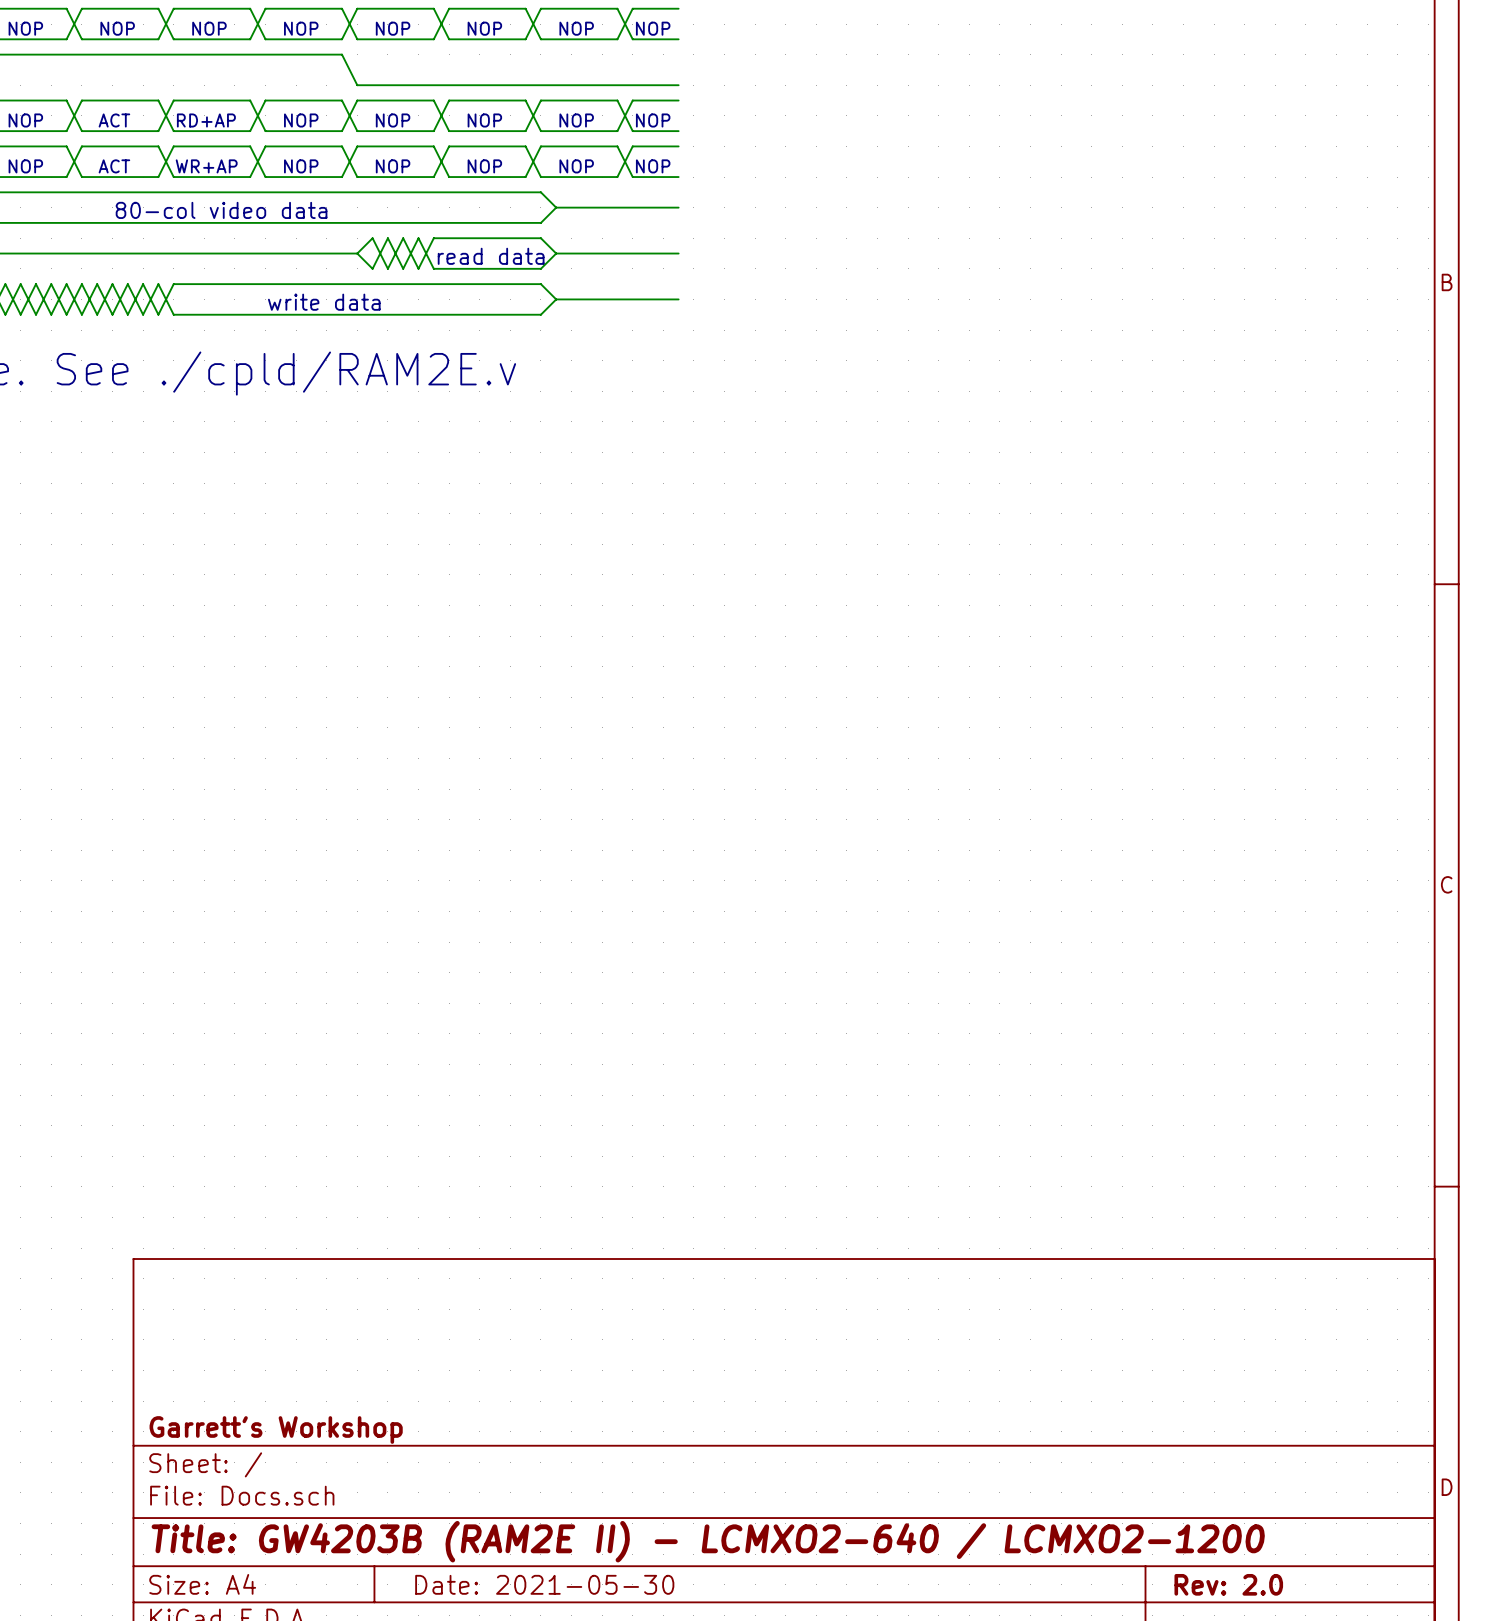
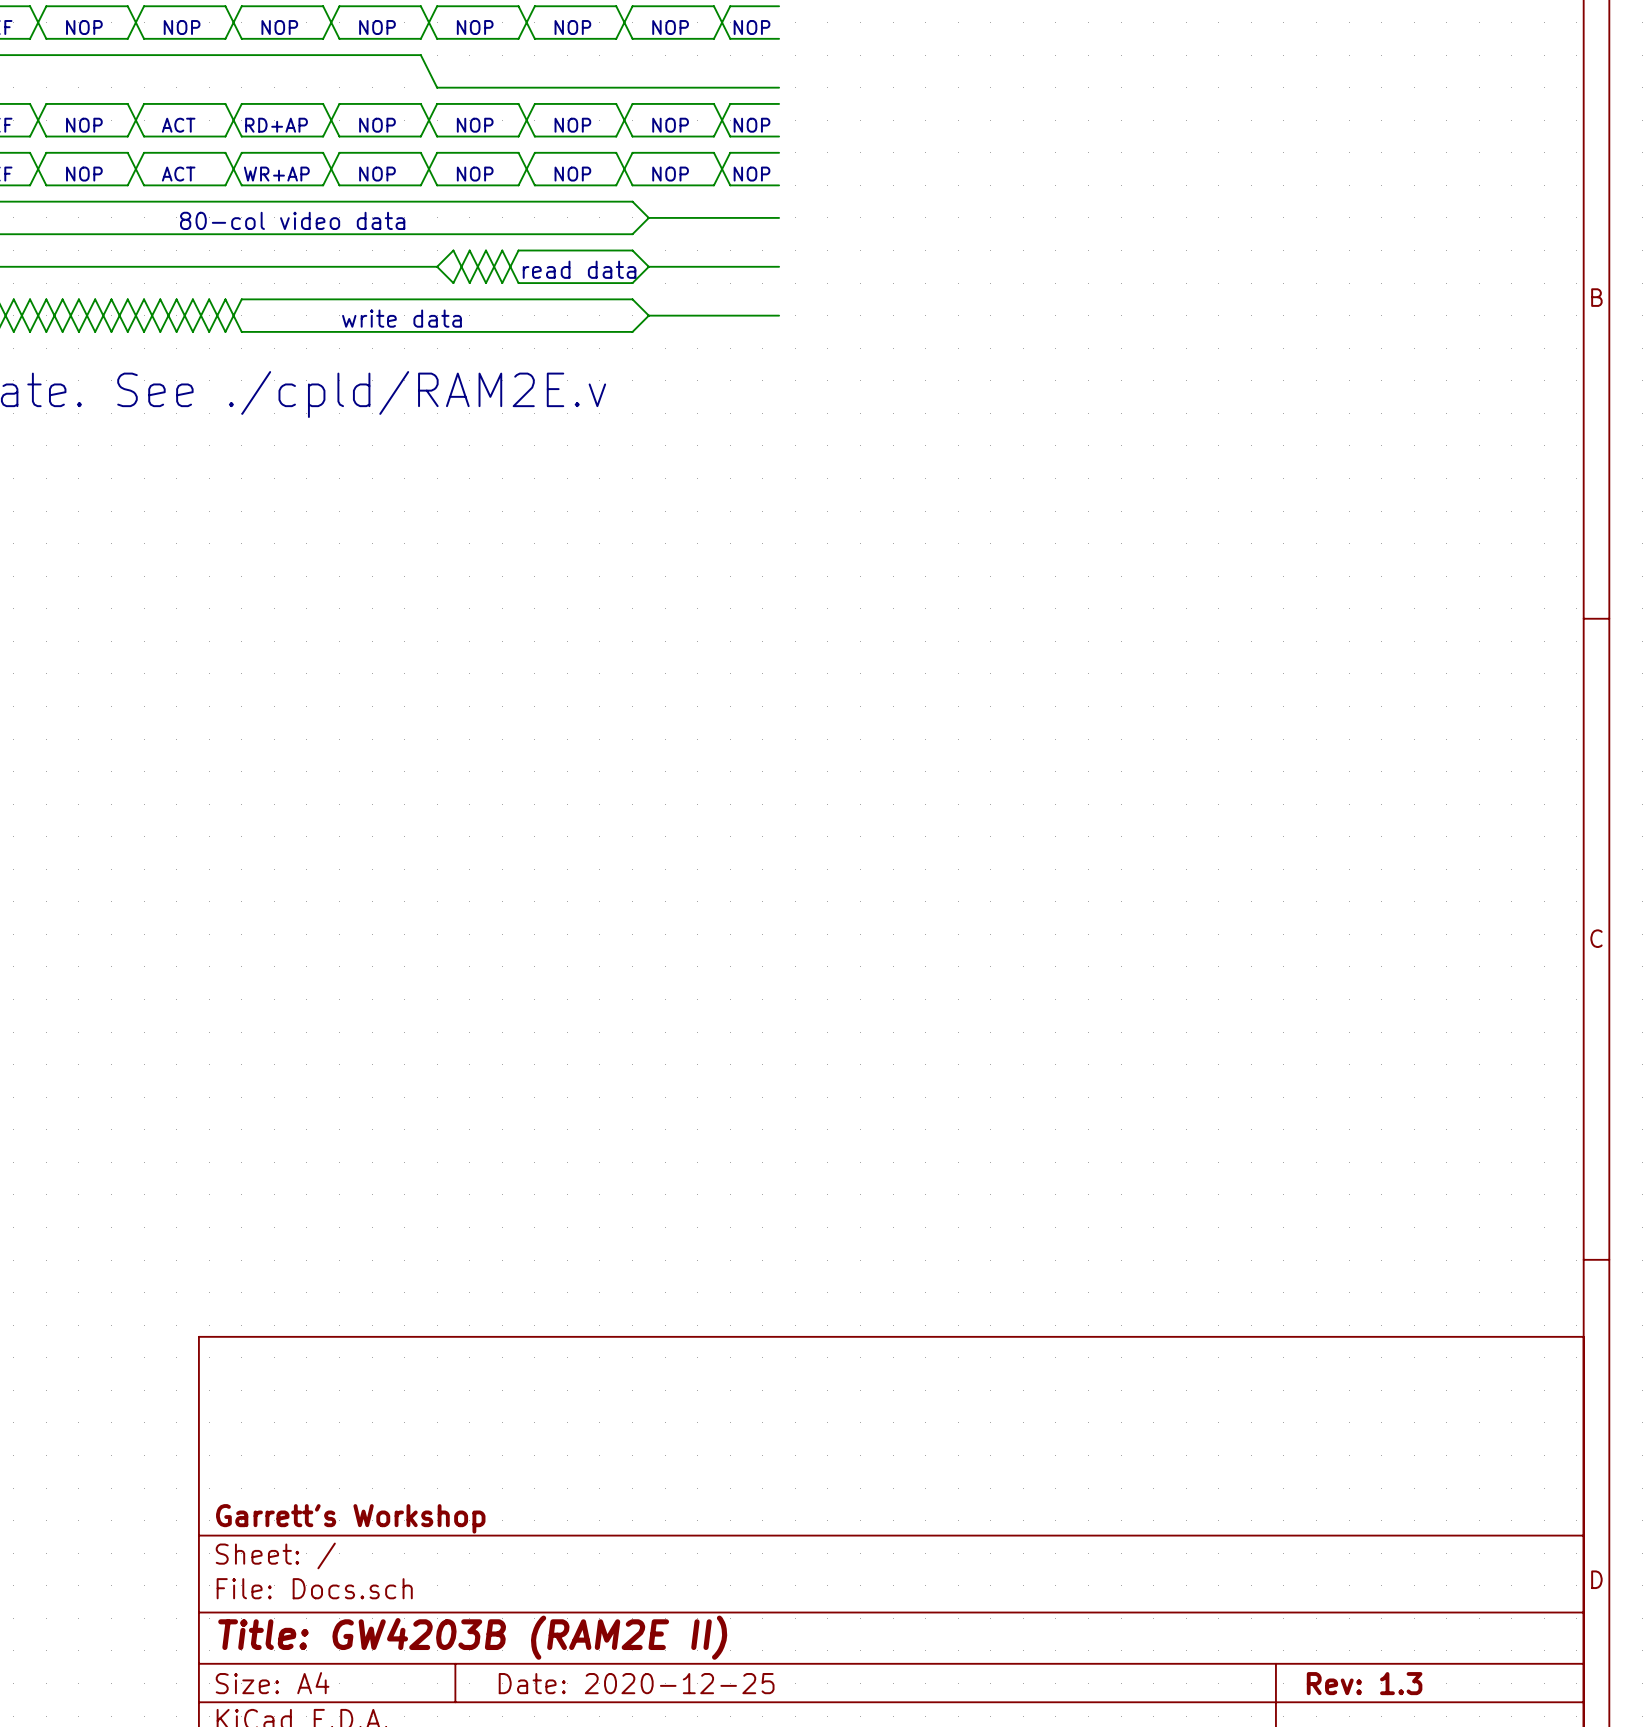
title block: Title: GW4203B (RAM2E II) - LCMXO2-640 / LCMXO2-1200 (708, 1541) -> Title: GW4203B (RAM2E II) (472, 1637)
title block: Date: 2021-05-30 (544, 1584) -> Date: 2020-12-25 (636, 1683)
title block: Rev: 2.0 (1228, 1584) -> Rev: 1.3 (1364, 1683)

